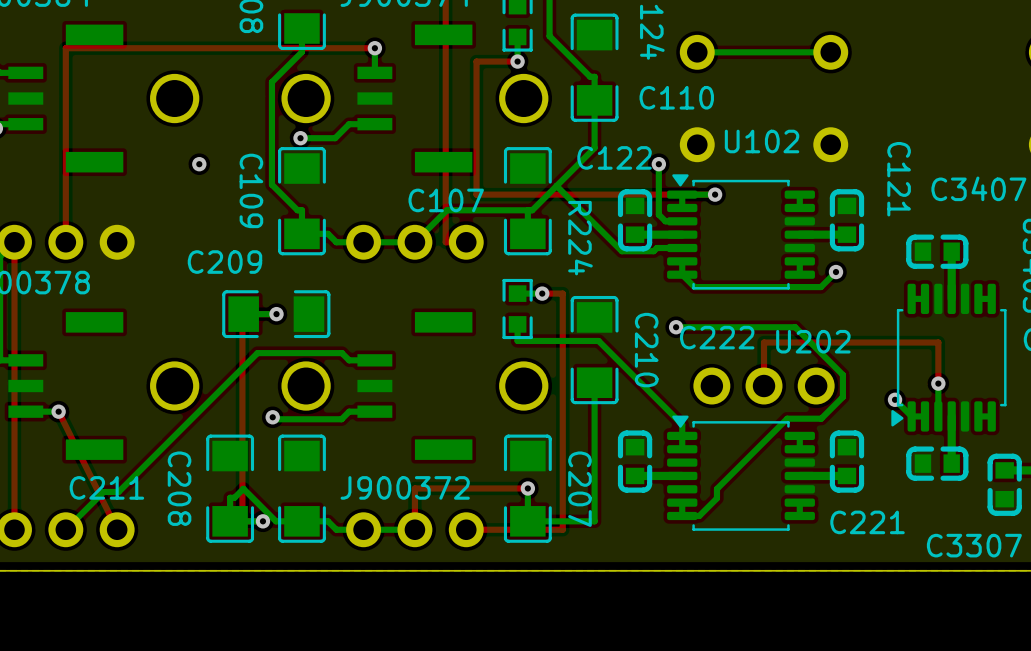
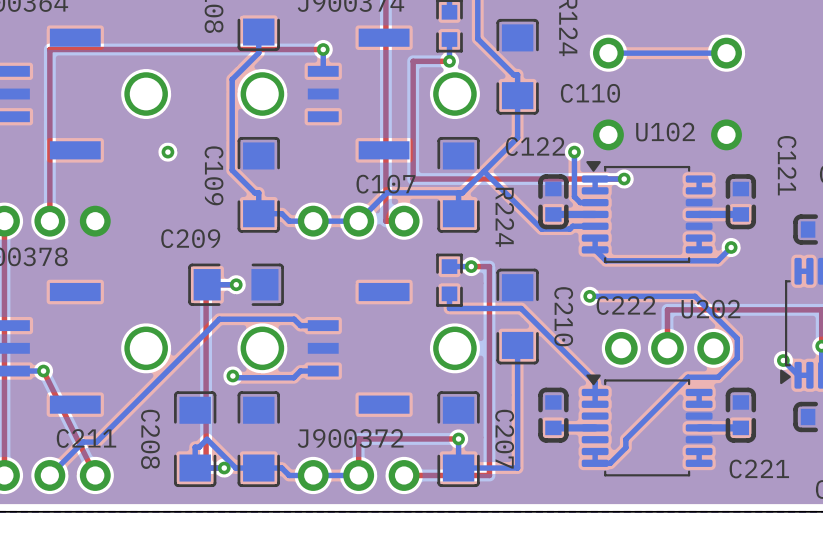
bottom track: (374, 124) (349, 124) (335, 138) (300, 138) -> none
via: (300, 138) -> none

